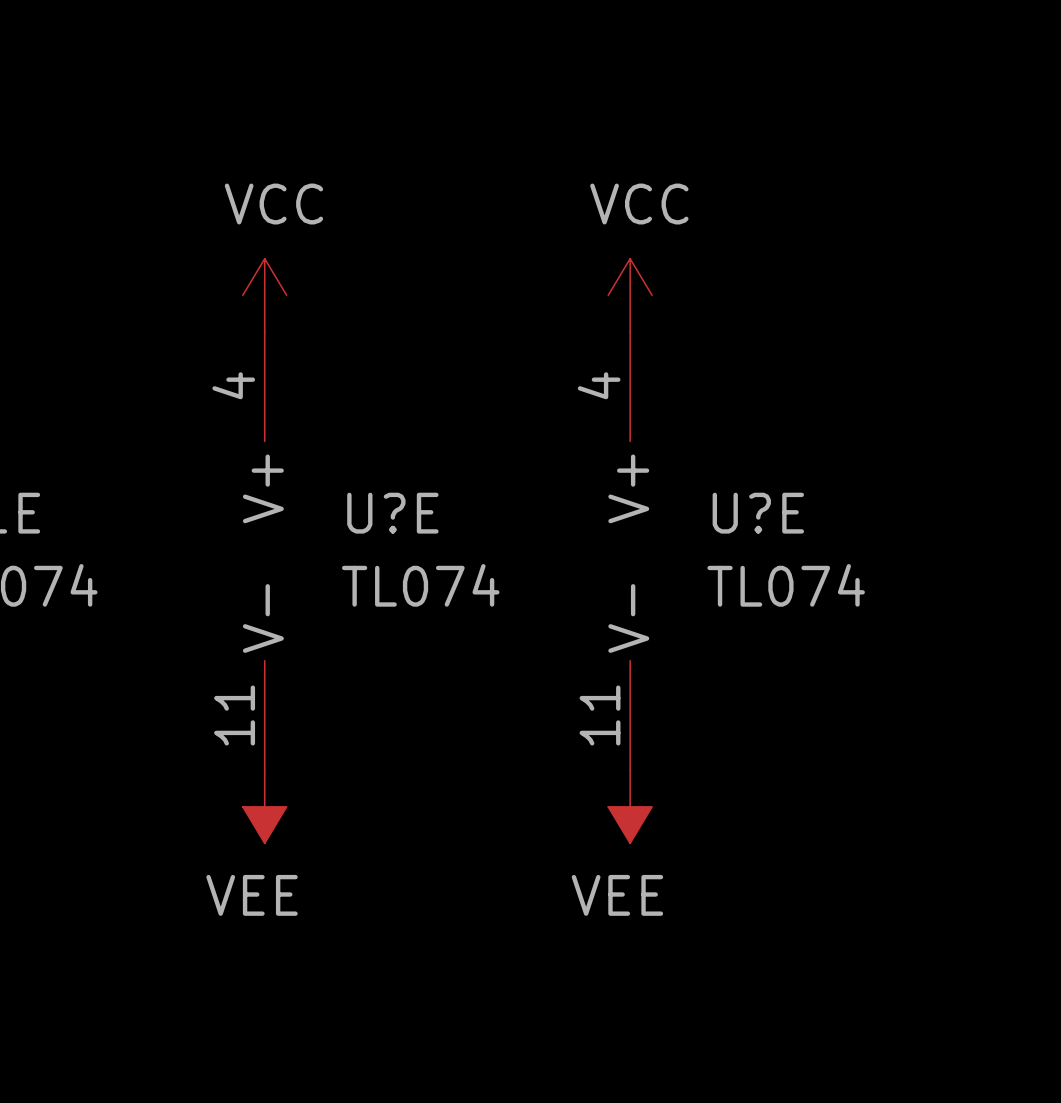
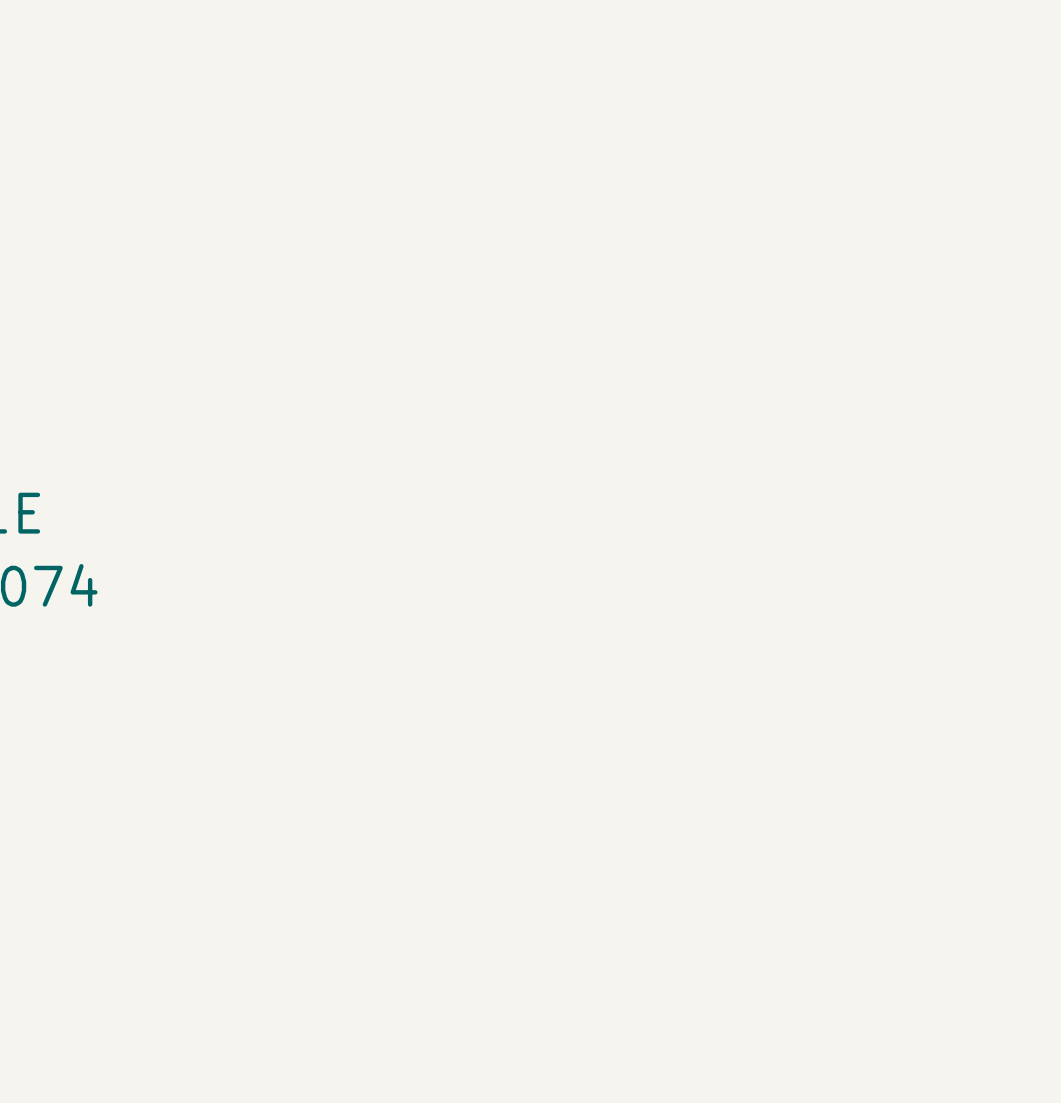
power symbol: VCC (264, 295) -> none
power symbol: VCC (630, 295) -> none
U?E: TL074 (264, 551) -> none
U?E: TL074 (630, 551) -> none
power symbol: VEE (264, 806) -> none
power symbol: VEE (630, 806) -> none

